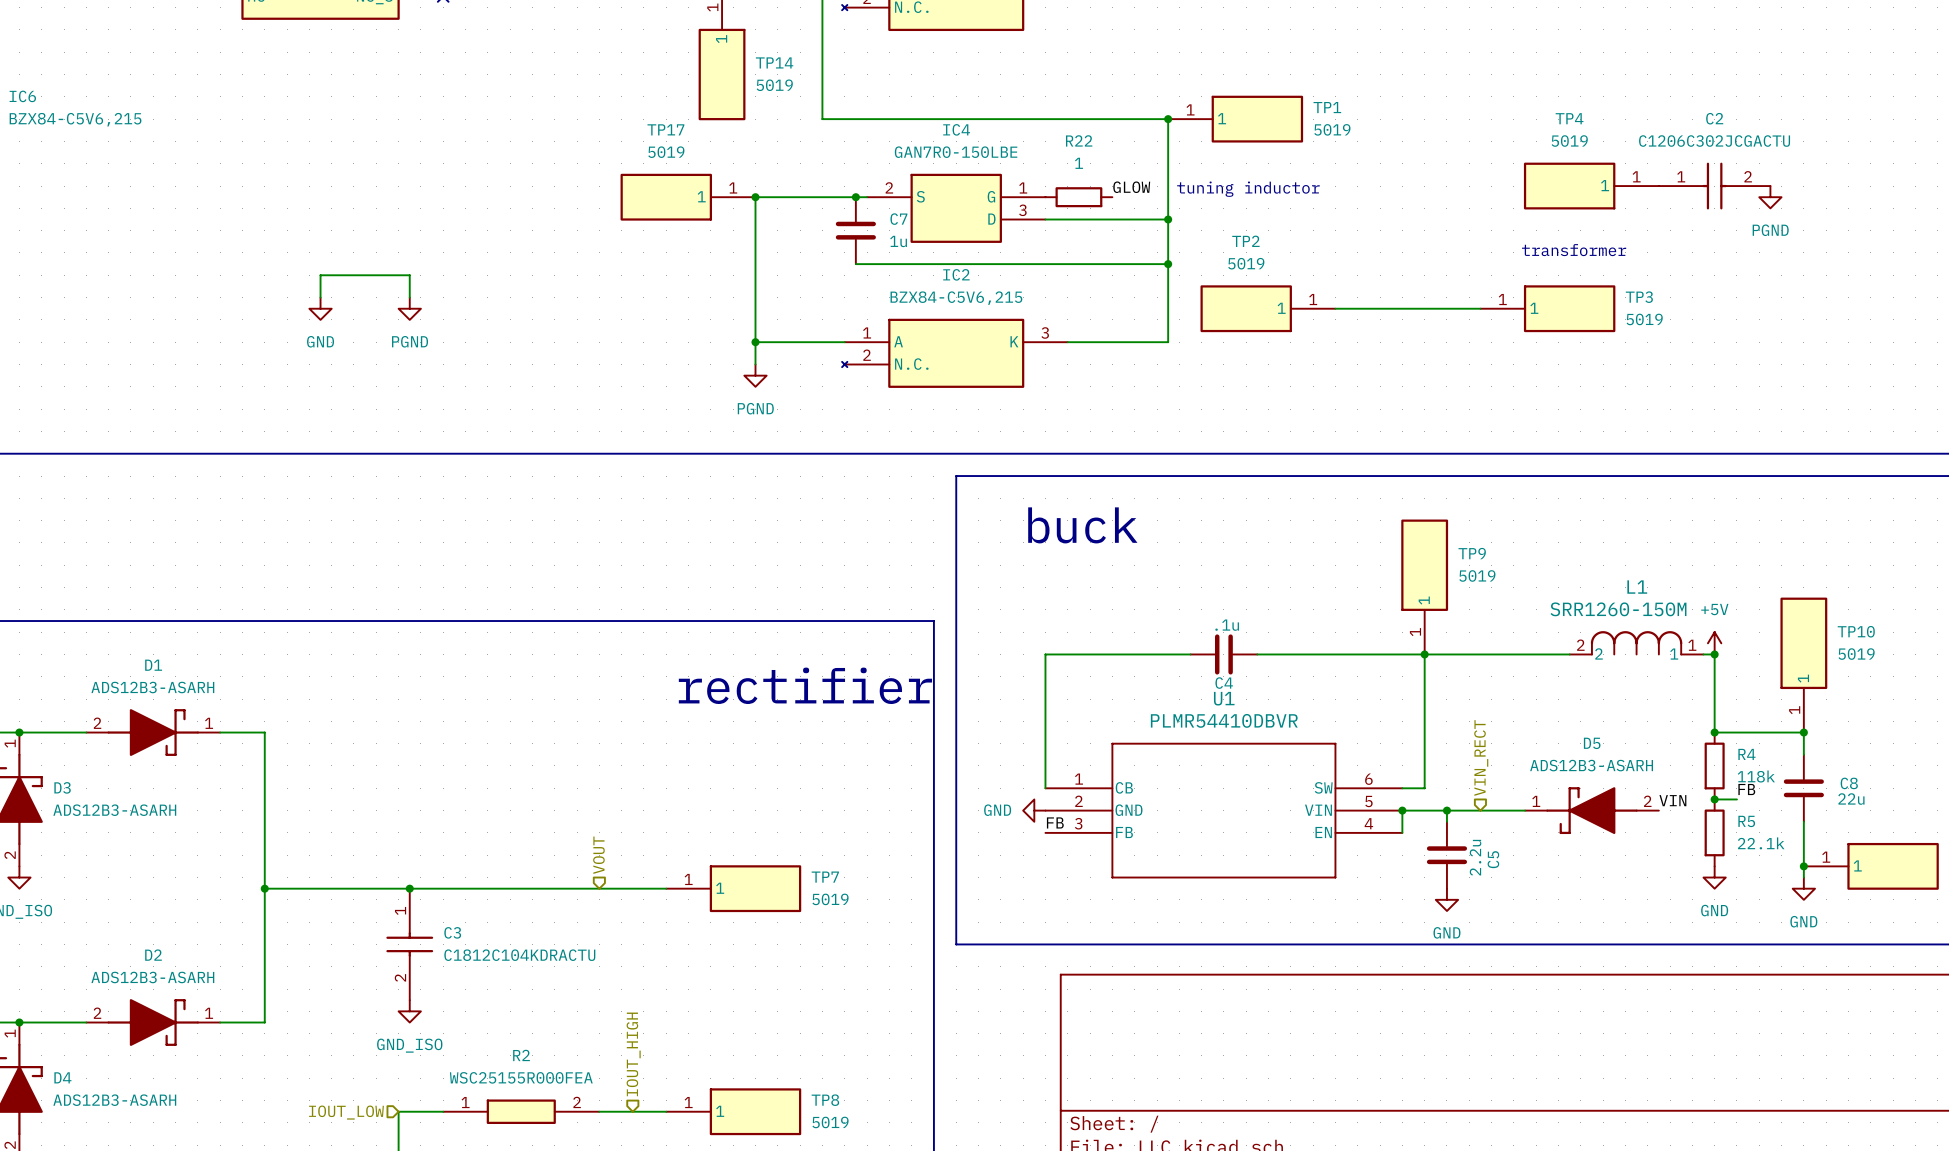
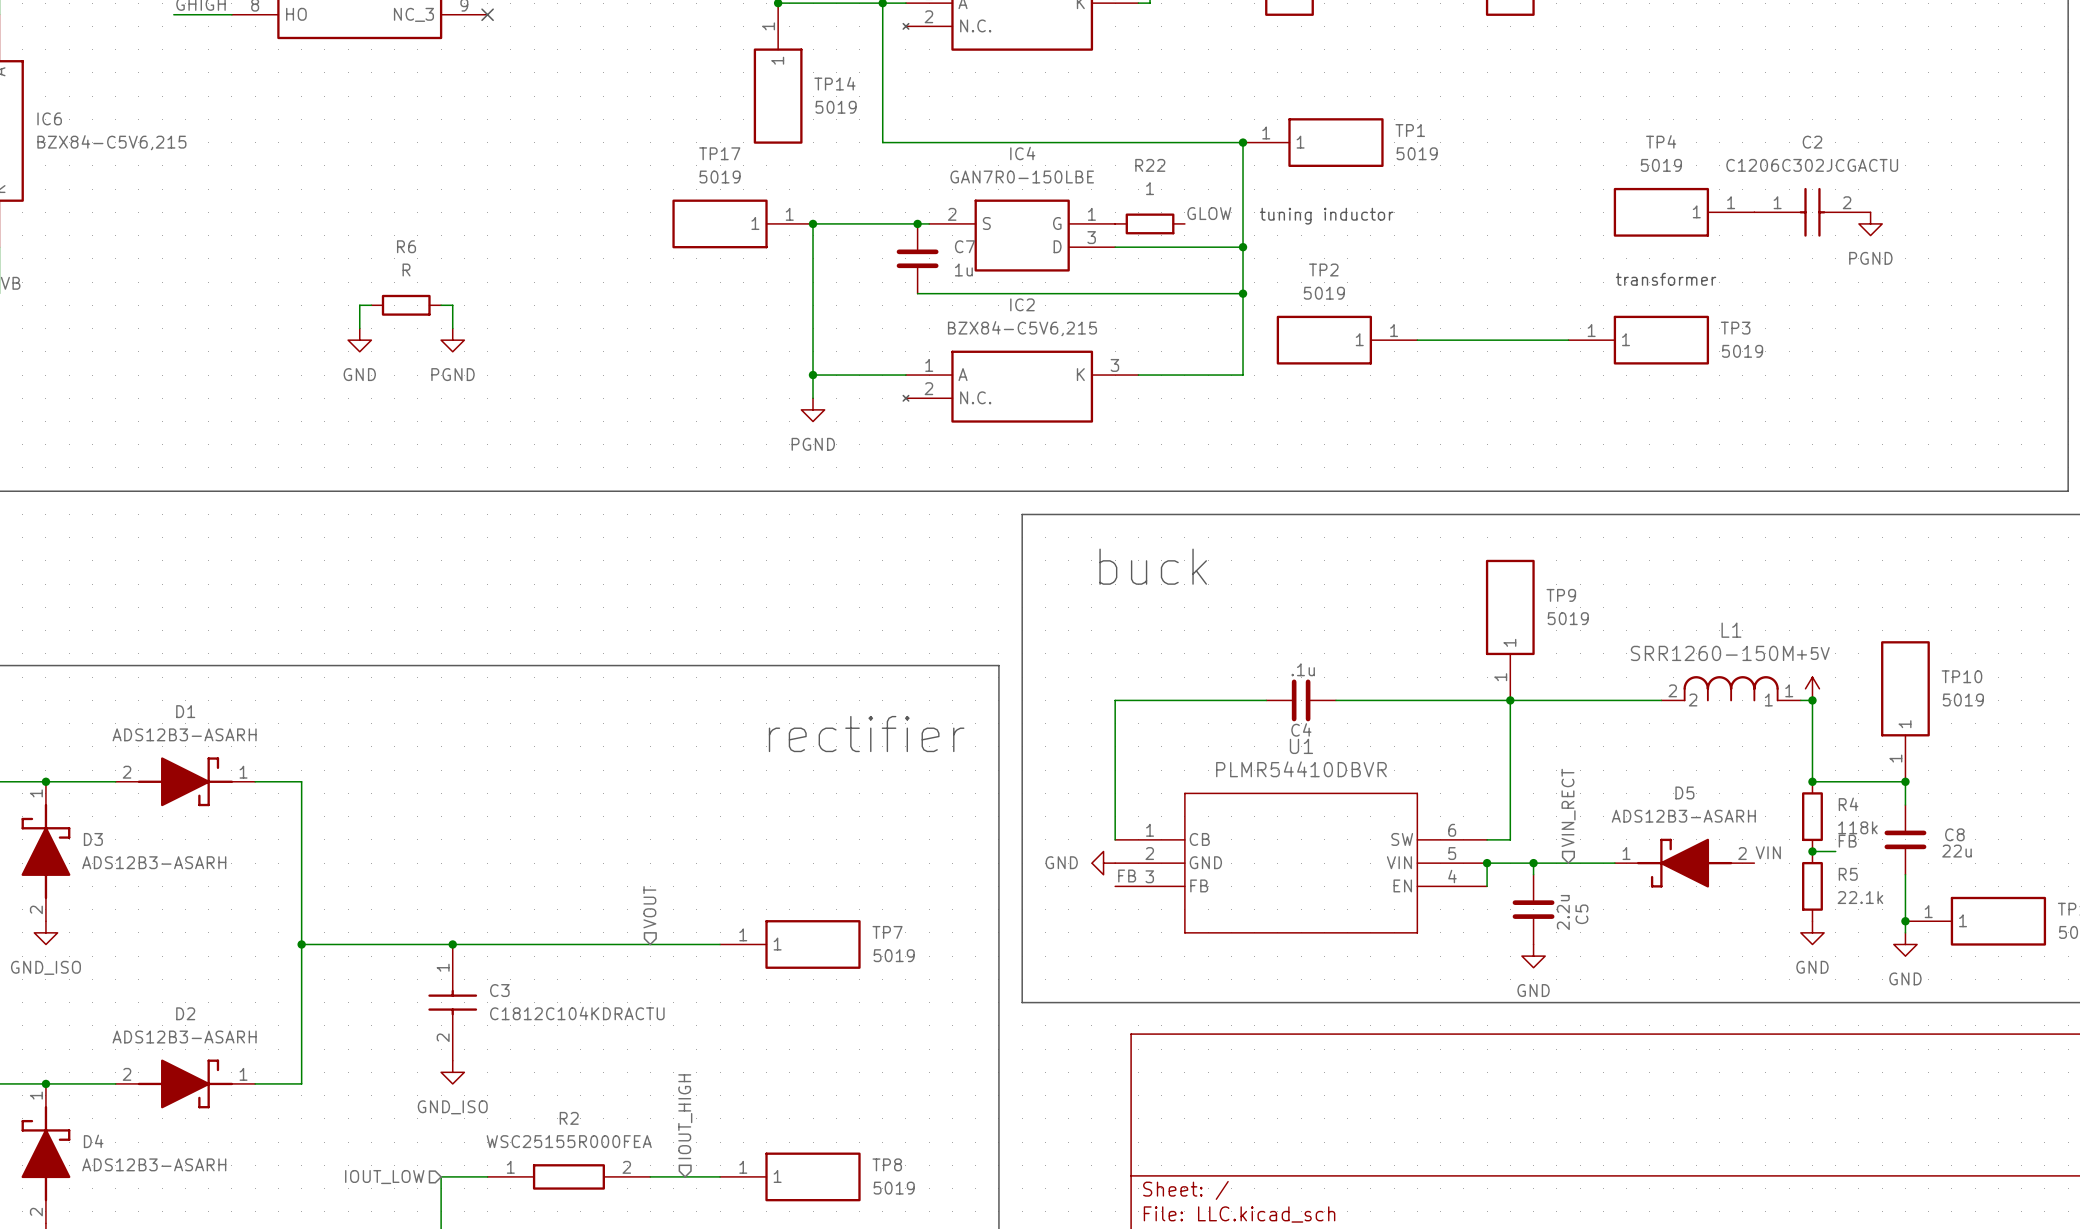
wire: (331, 275) (398, 275) -> none
R6: none -> R (406, 305)

